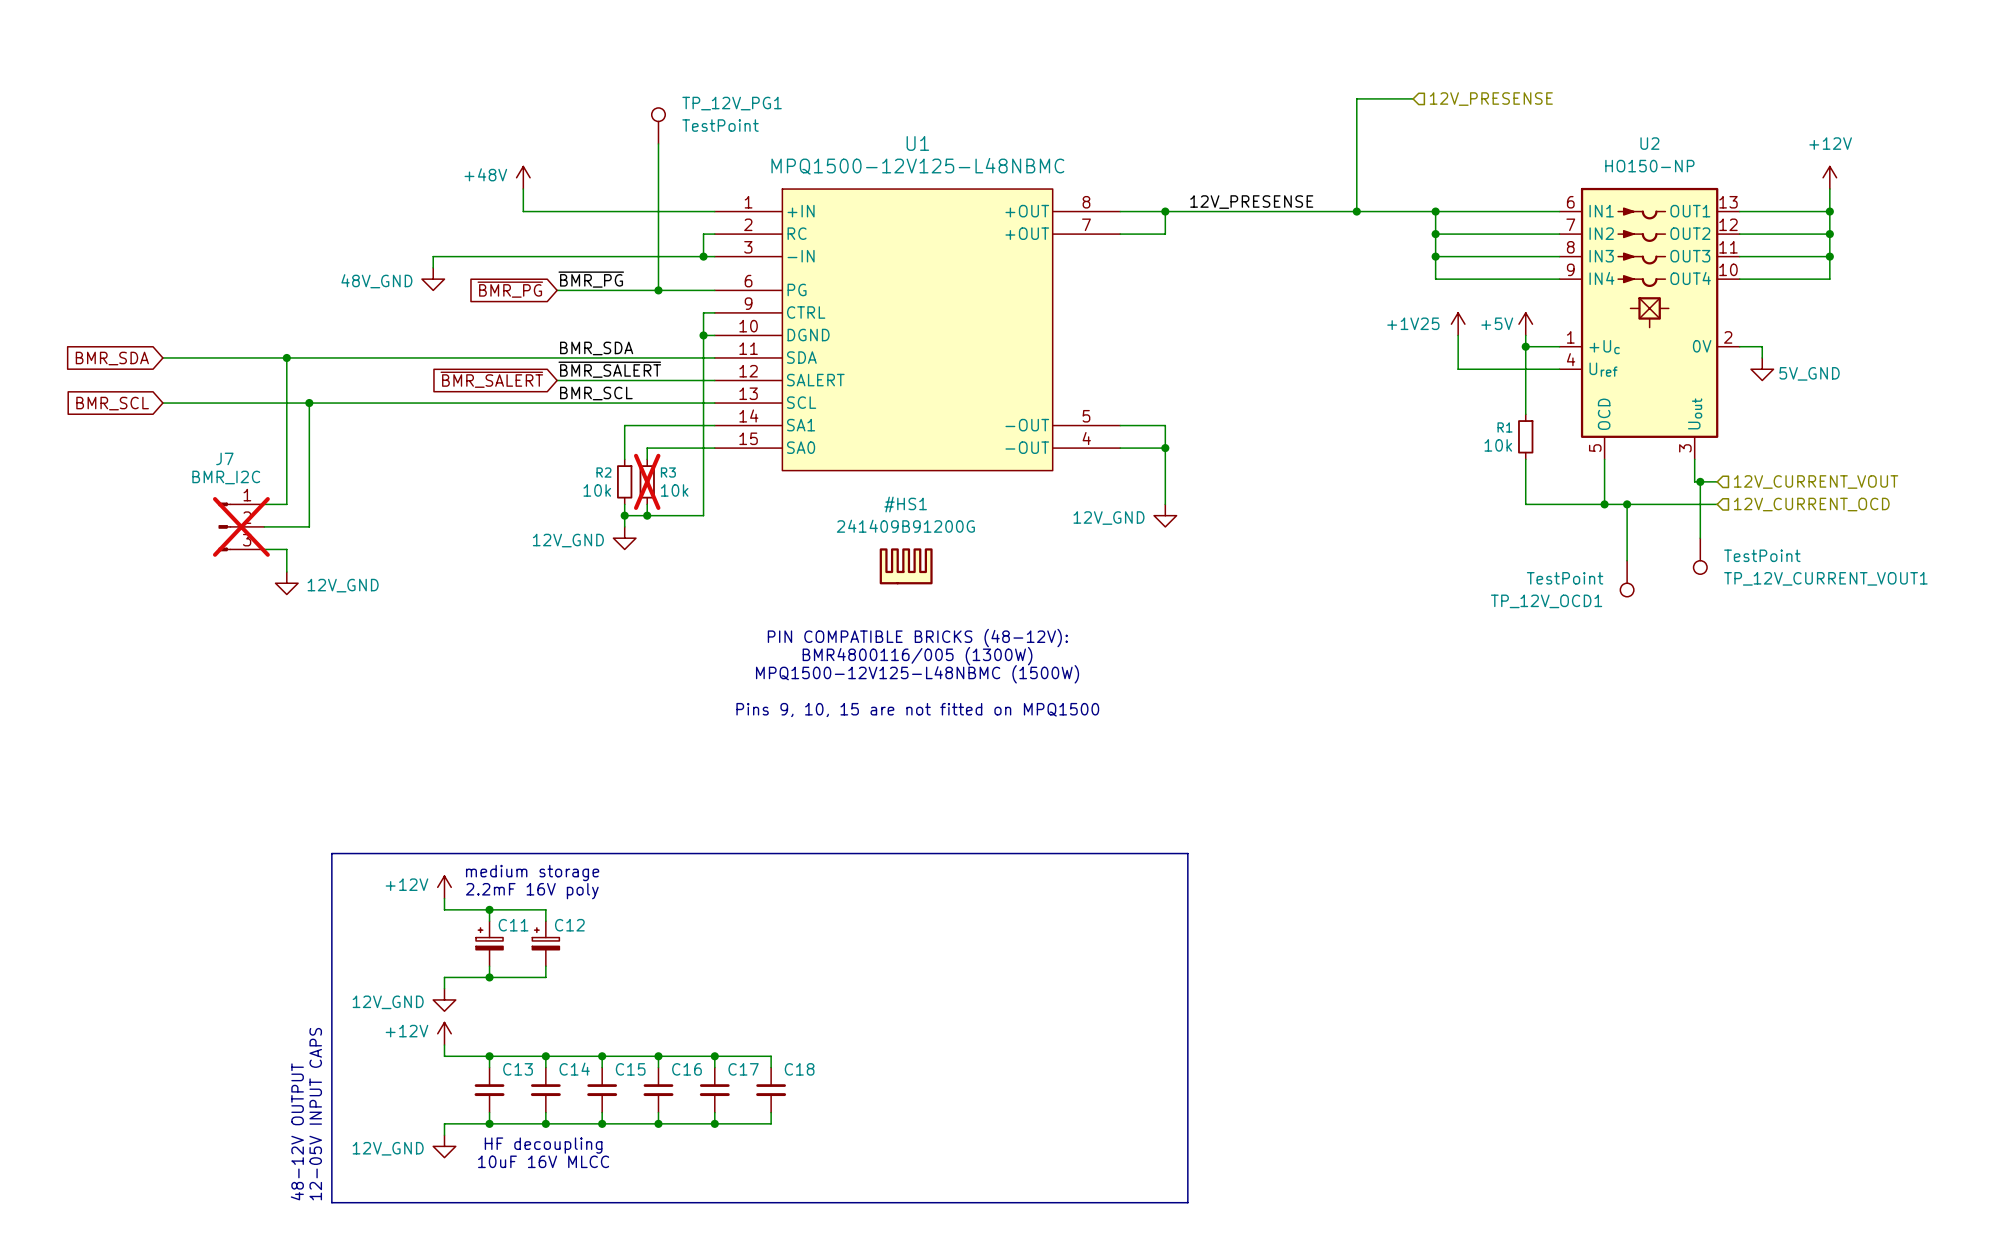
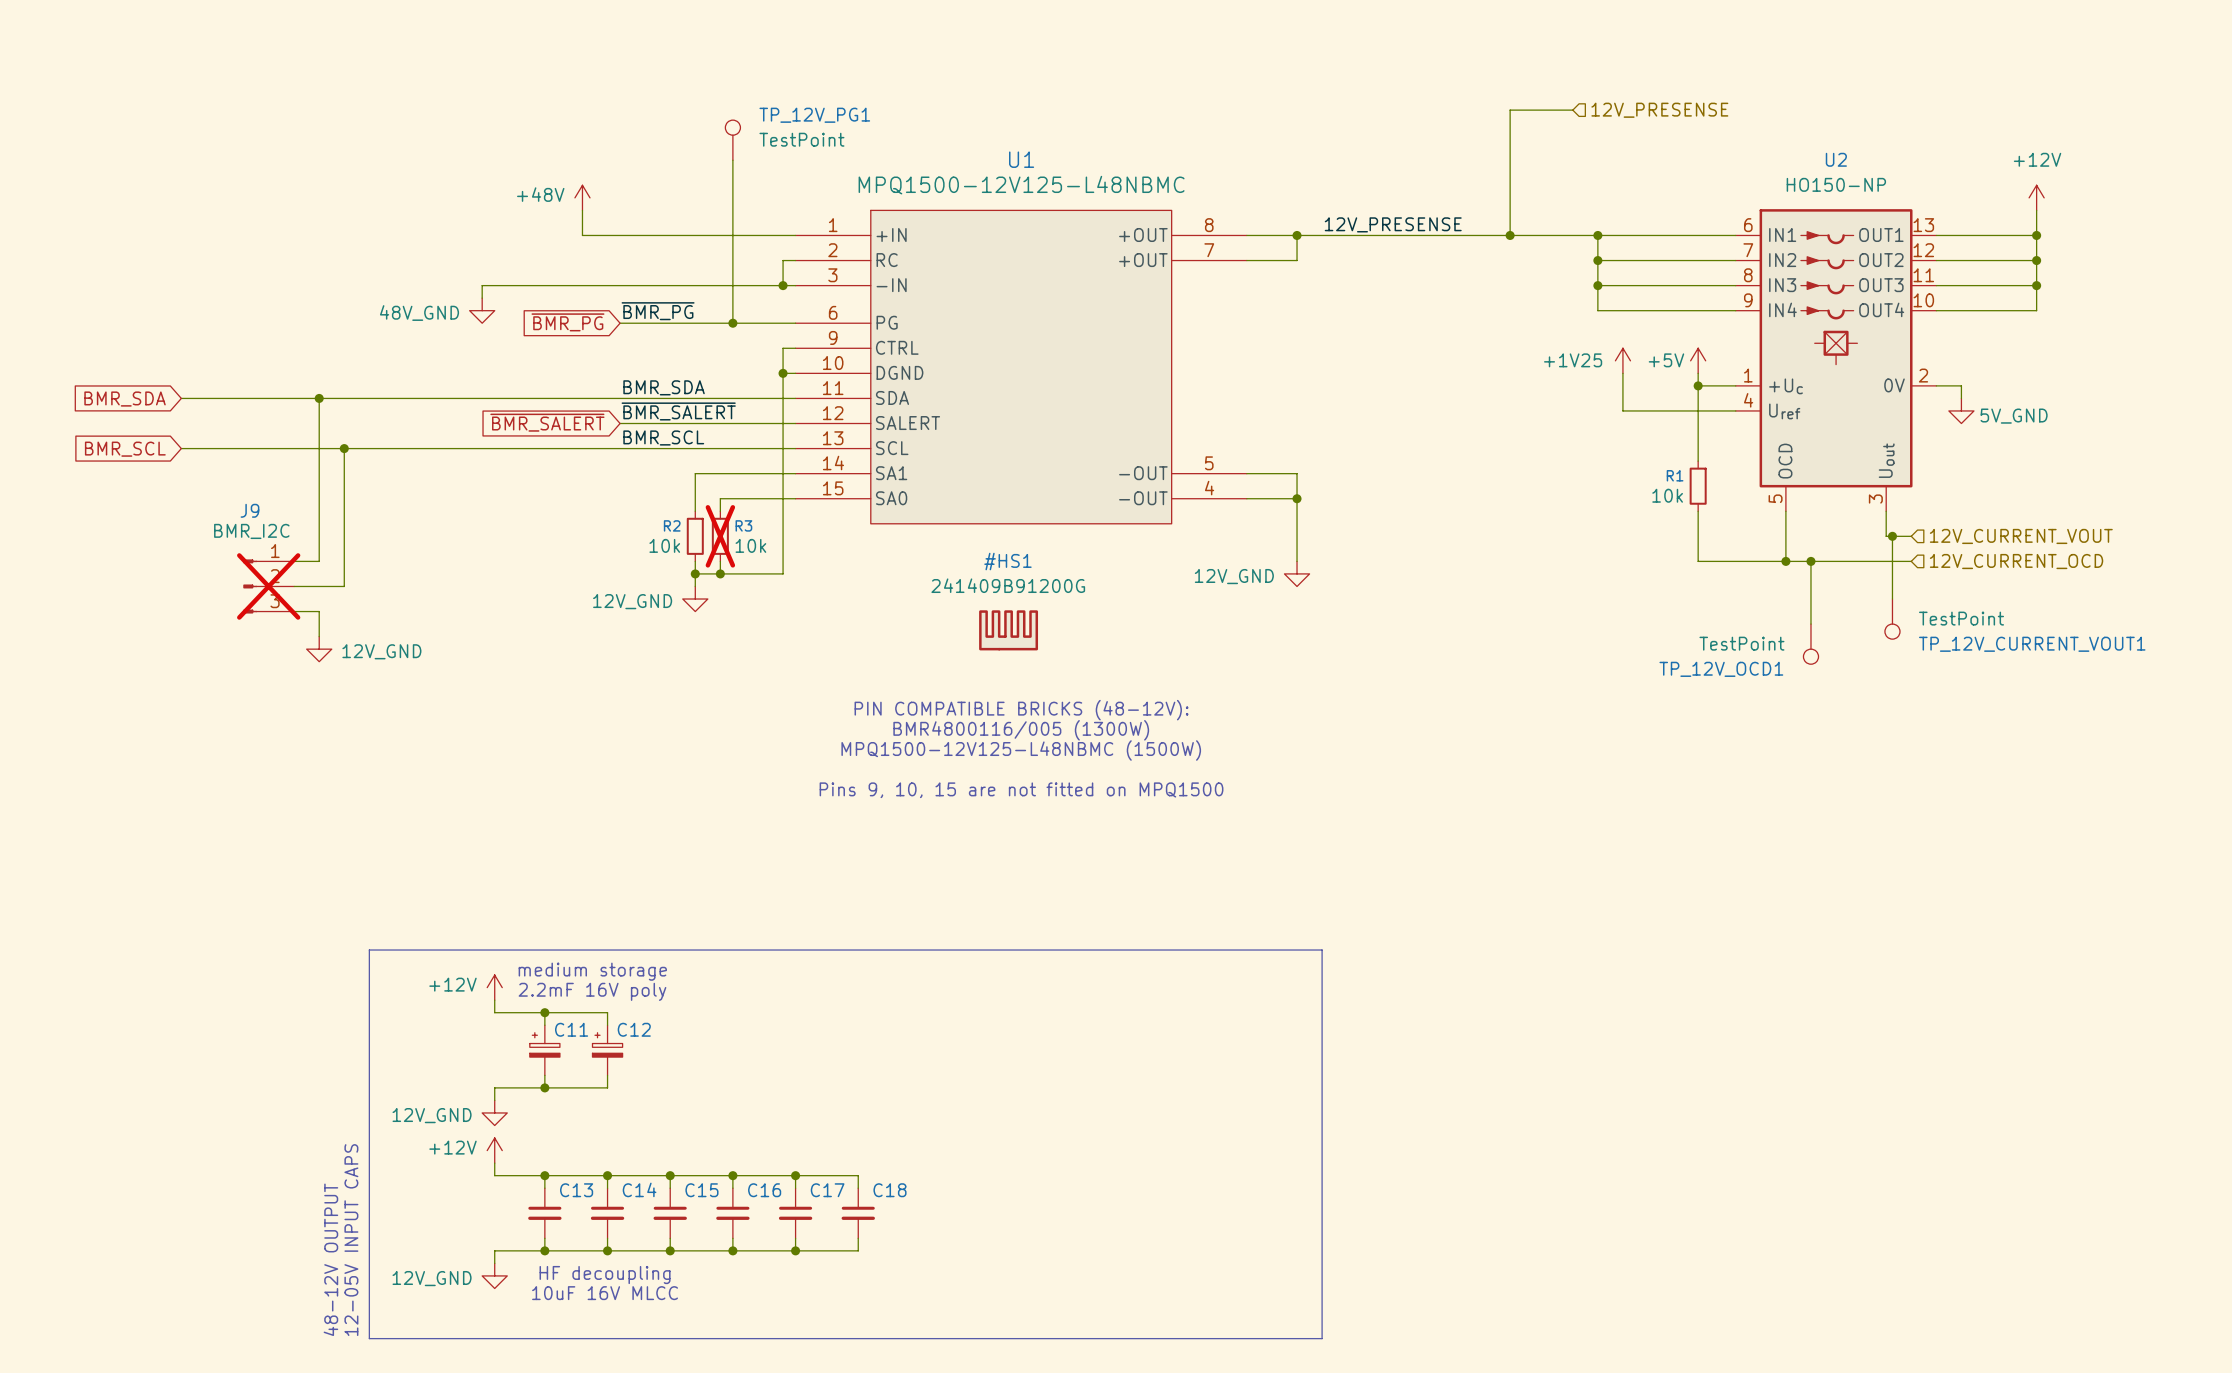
J7 name: J7 (224, 458) -> J9 (249, 510)

